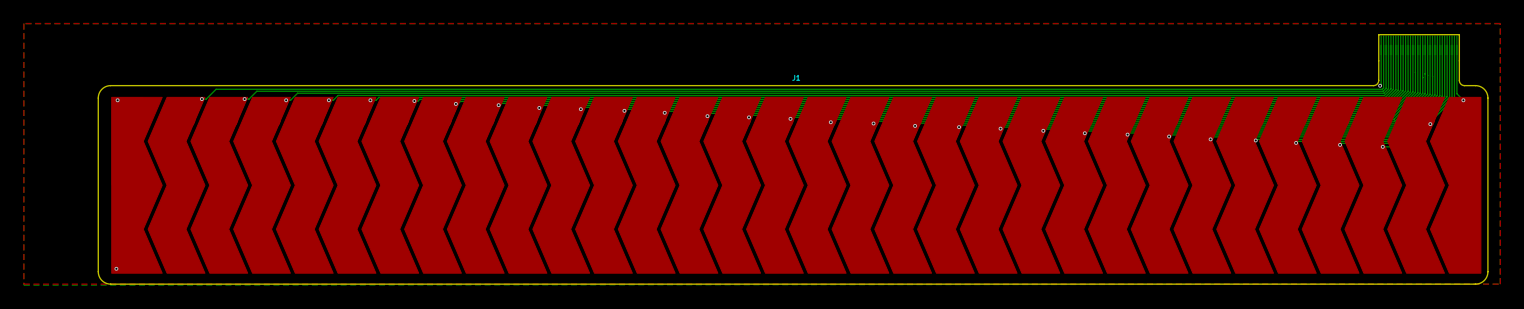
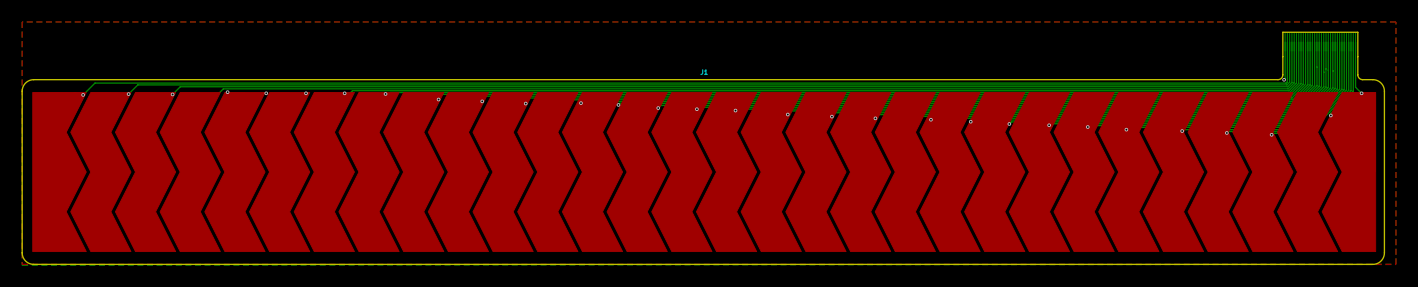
board edge: (110, 85) (101, 89) (98, 98) (98, 273) (103, 281) (110, 284) -> (102, 79) (32, 79) (25, 83) (22, 91) (23, 257) (26, 261) (32, 264) (102, 264)
bottom track: (216, 89) (206, 99) (201, 99) -> (201, 83) (94, 83) (83, 94)
bottom track: (256, 91) (249, 99) (244, 99) -> (238, 84) (137, 84) (128, 94)
bottom track: (297, 93) (290, 100) (286, 100) -> (276, 86) (180, 86) (172, 94)
bottom track: (338, 95) (333, 100) (328, 100) -> (314, 88) (223, 88) (217, 94)
part footprint: [111, 96, 1482, 274] -> [32, 92, 1377, 253]
via position: (201, 99) -> (172, 94)
via: (117, 100) -> none
via: none -> (128, 94)
via: none -> (83, 94)
via: (455, 103) -> none
via: (498, 105) -> none
via: none -> (438, 99)
via: (539, 107) -> none
via: none -> (482, 101)
via: (580, 109) -> none
via: none -> (525, 103)
via: (830, 122) -> none
via: none -> (787, 114)
via: (873, 123) -> none
via: none -> (831, 116)
via: (915, 125) -> none
via: none -> (875, 118)
via: (959, 127) -> none
via: (1255, 140) -> none
via: none -> (1182, 131)
via: (1296, 142) -> none
via: none -> (1226, 132)
via: (1340, 144) -> none
via: none -> (1271, 134)
via: (1382, 146) -> none
via: (116, 268) -> none

